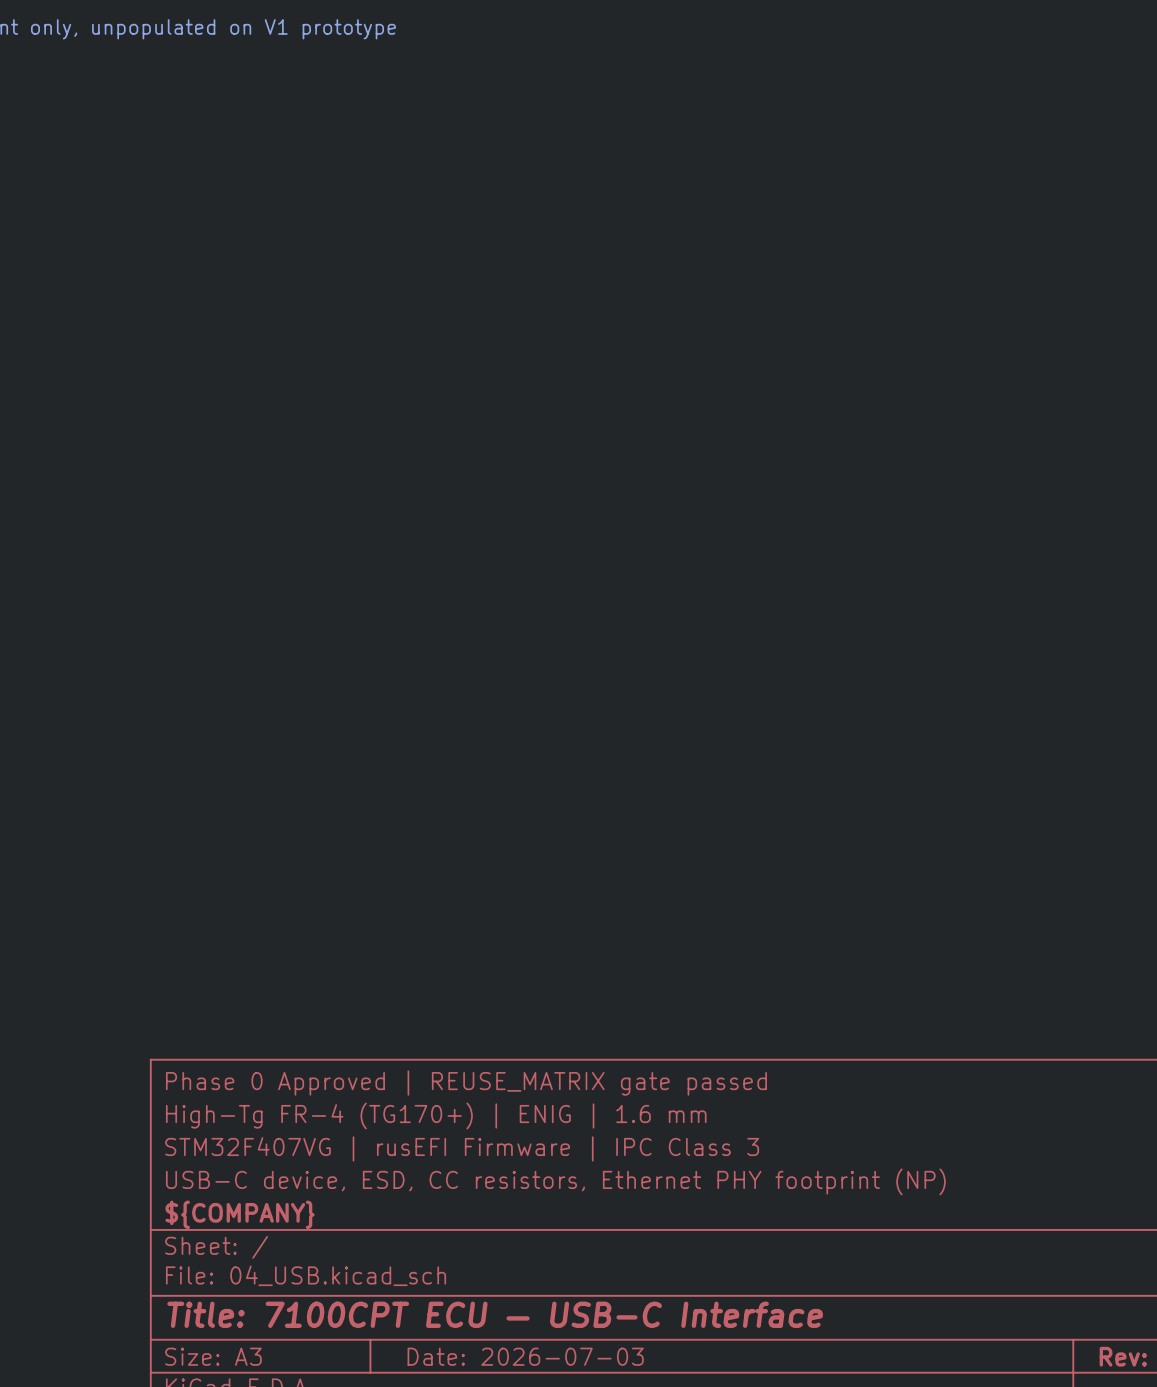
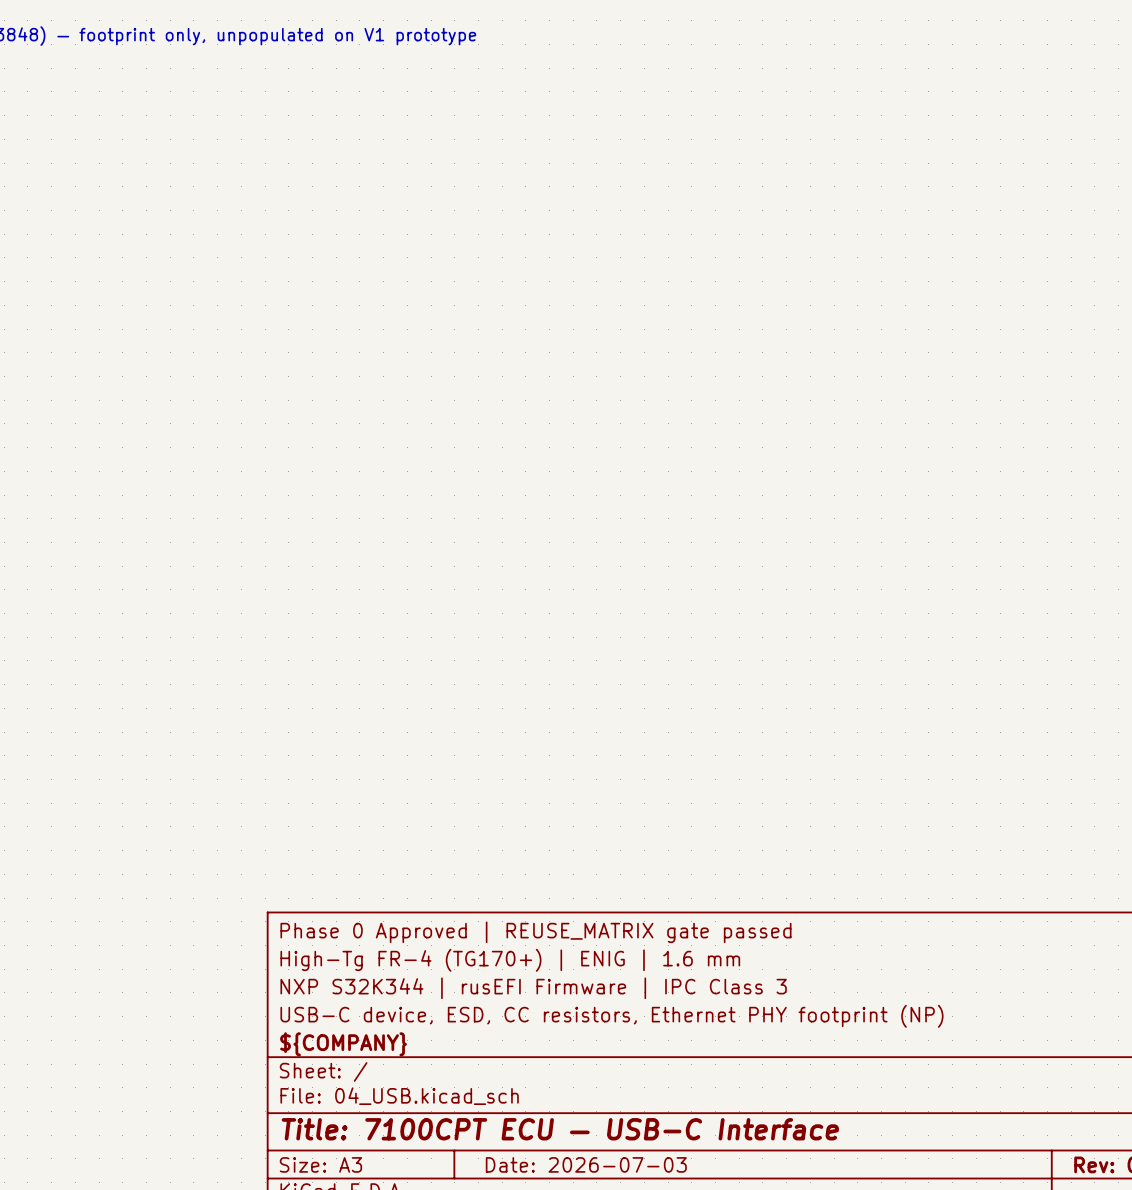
title block: STM32F407VG | rusEFI Firmware | IPC Class 3 (462, 1148) -> NXP S32K344 | rusEFI Firmware | IPC Class 3 (533, 988)

